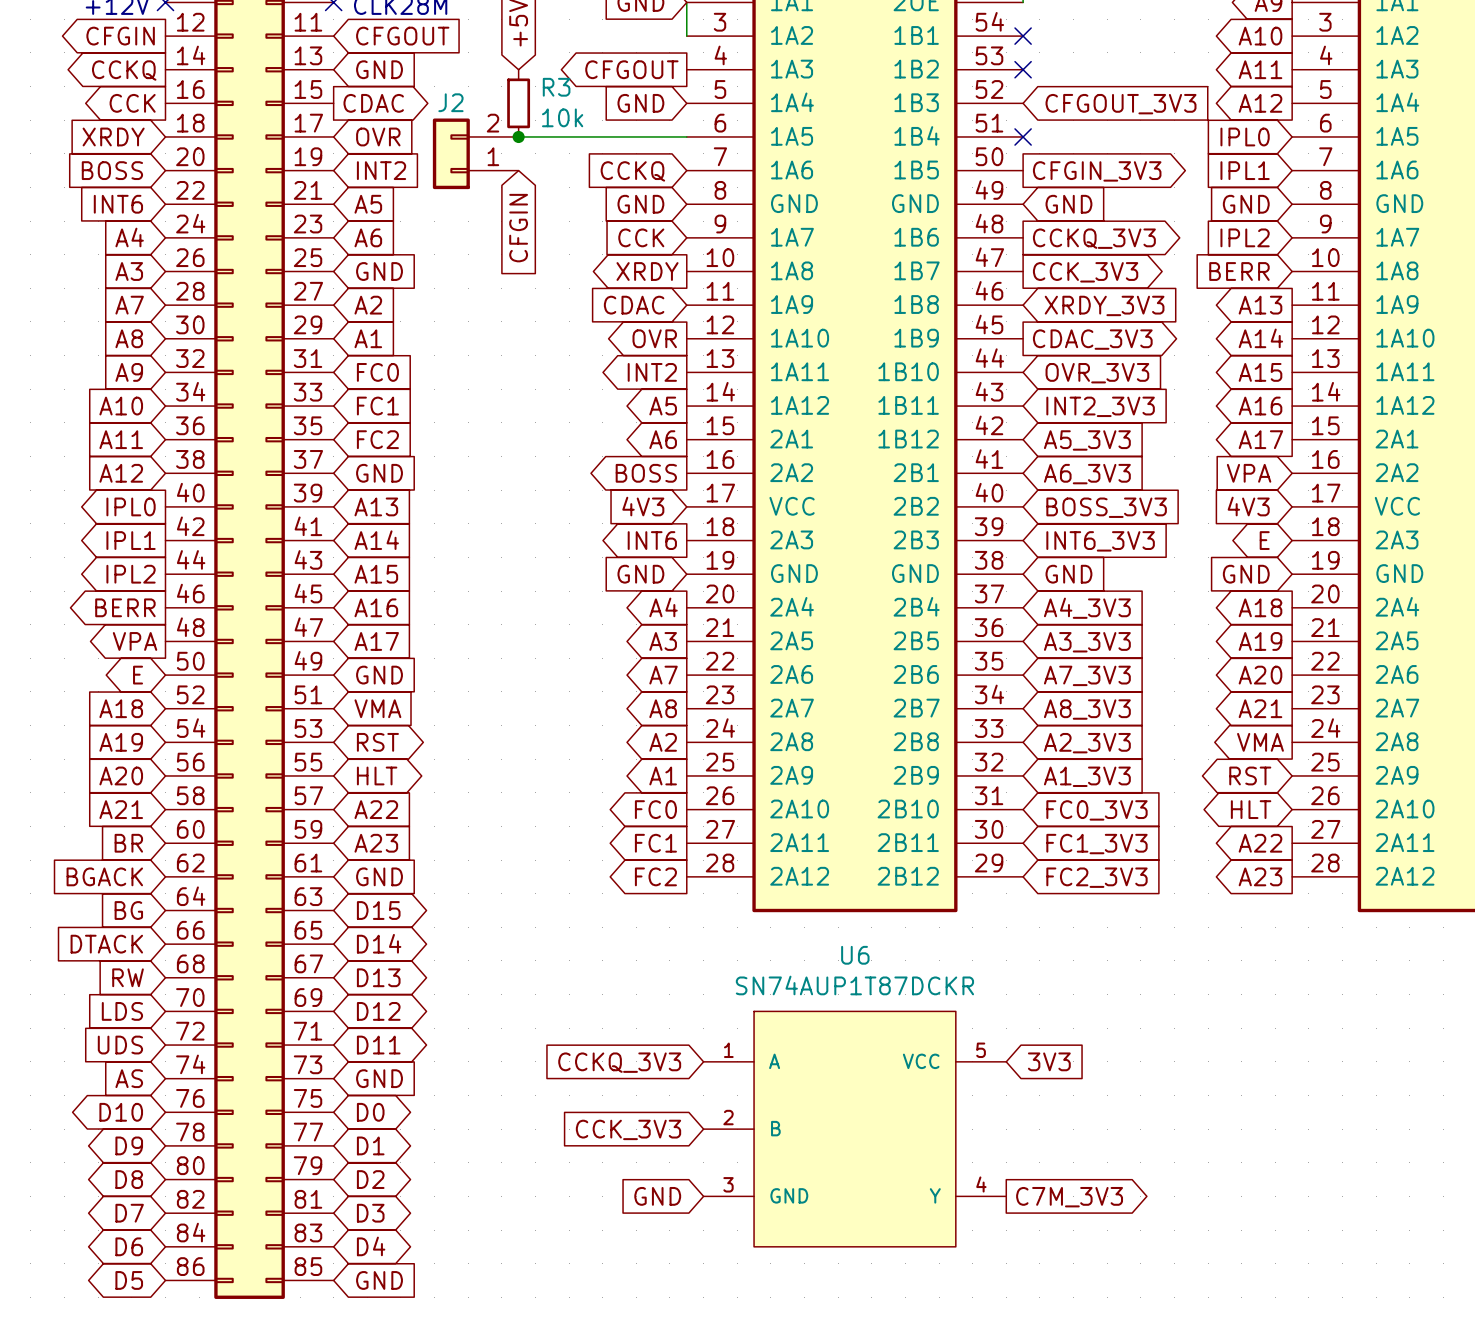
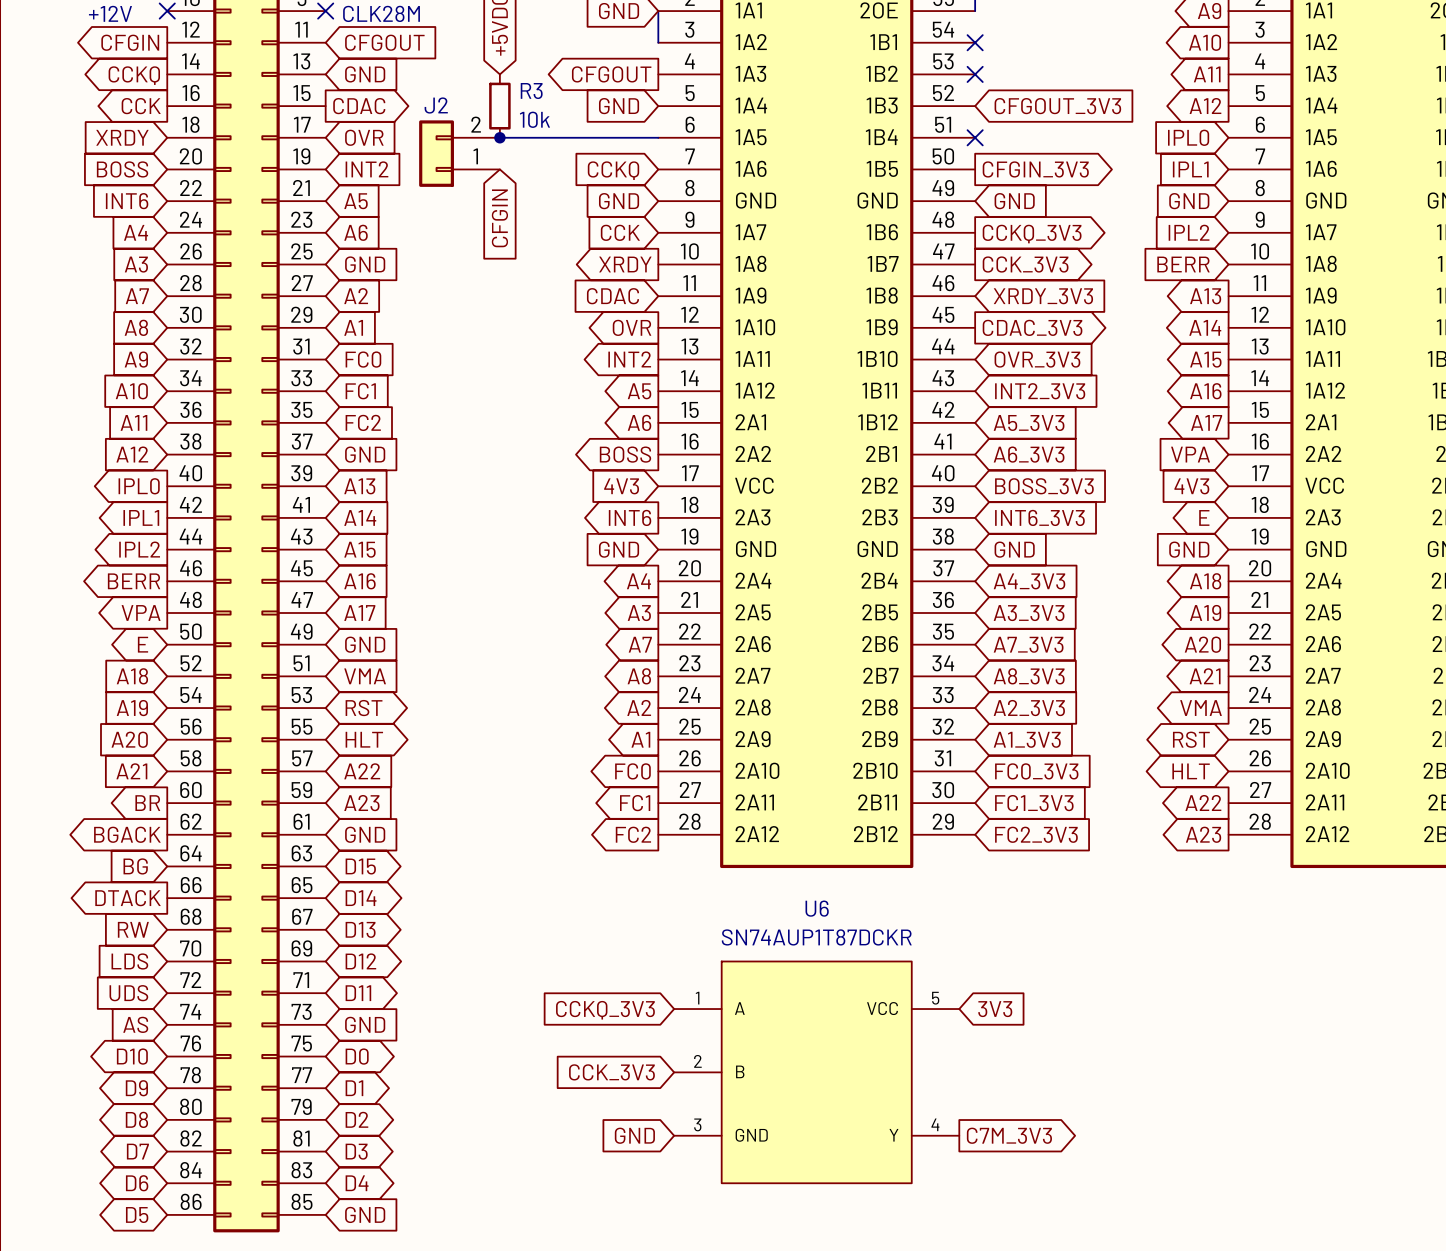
global label shape: input (128, 843) -> output (147, 803)
global label shape: input (104, 876) -> output (127, 834)
global label shape: input (106, 944) -> output (128, 898)

